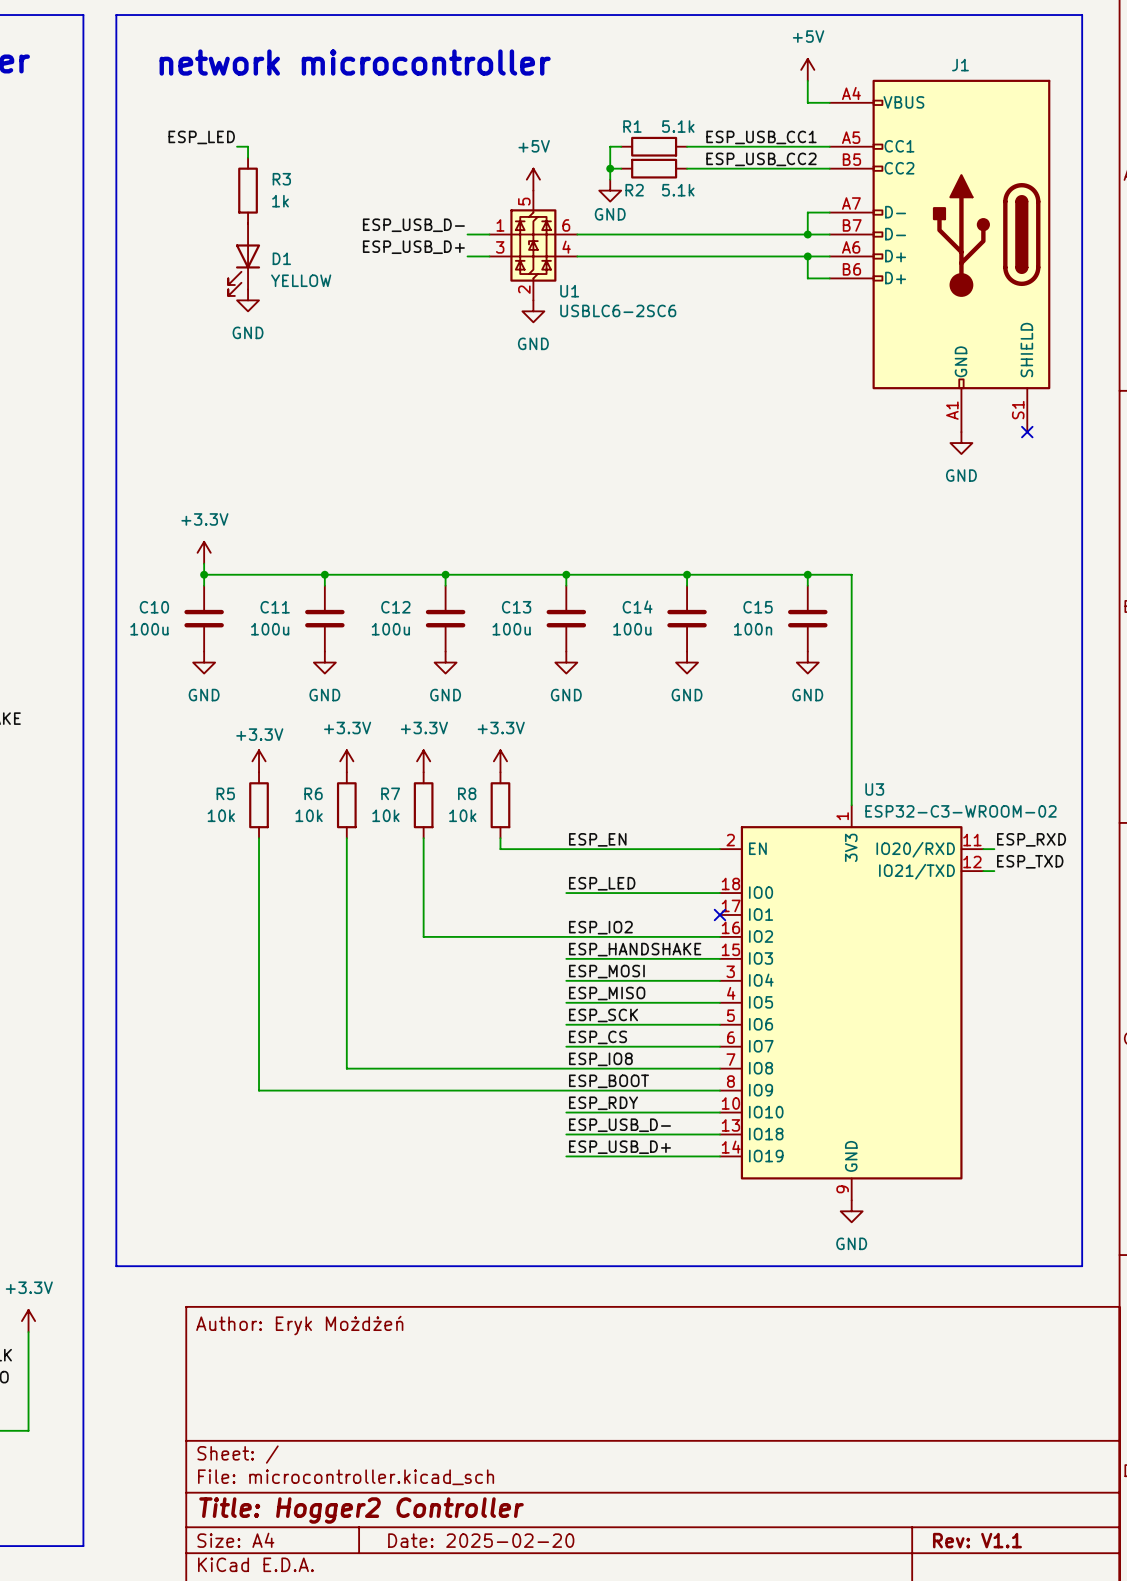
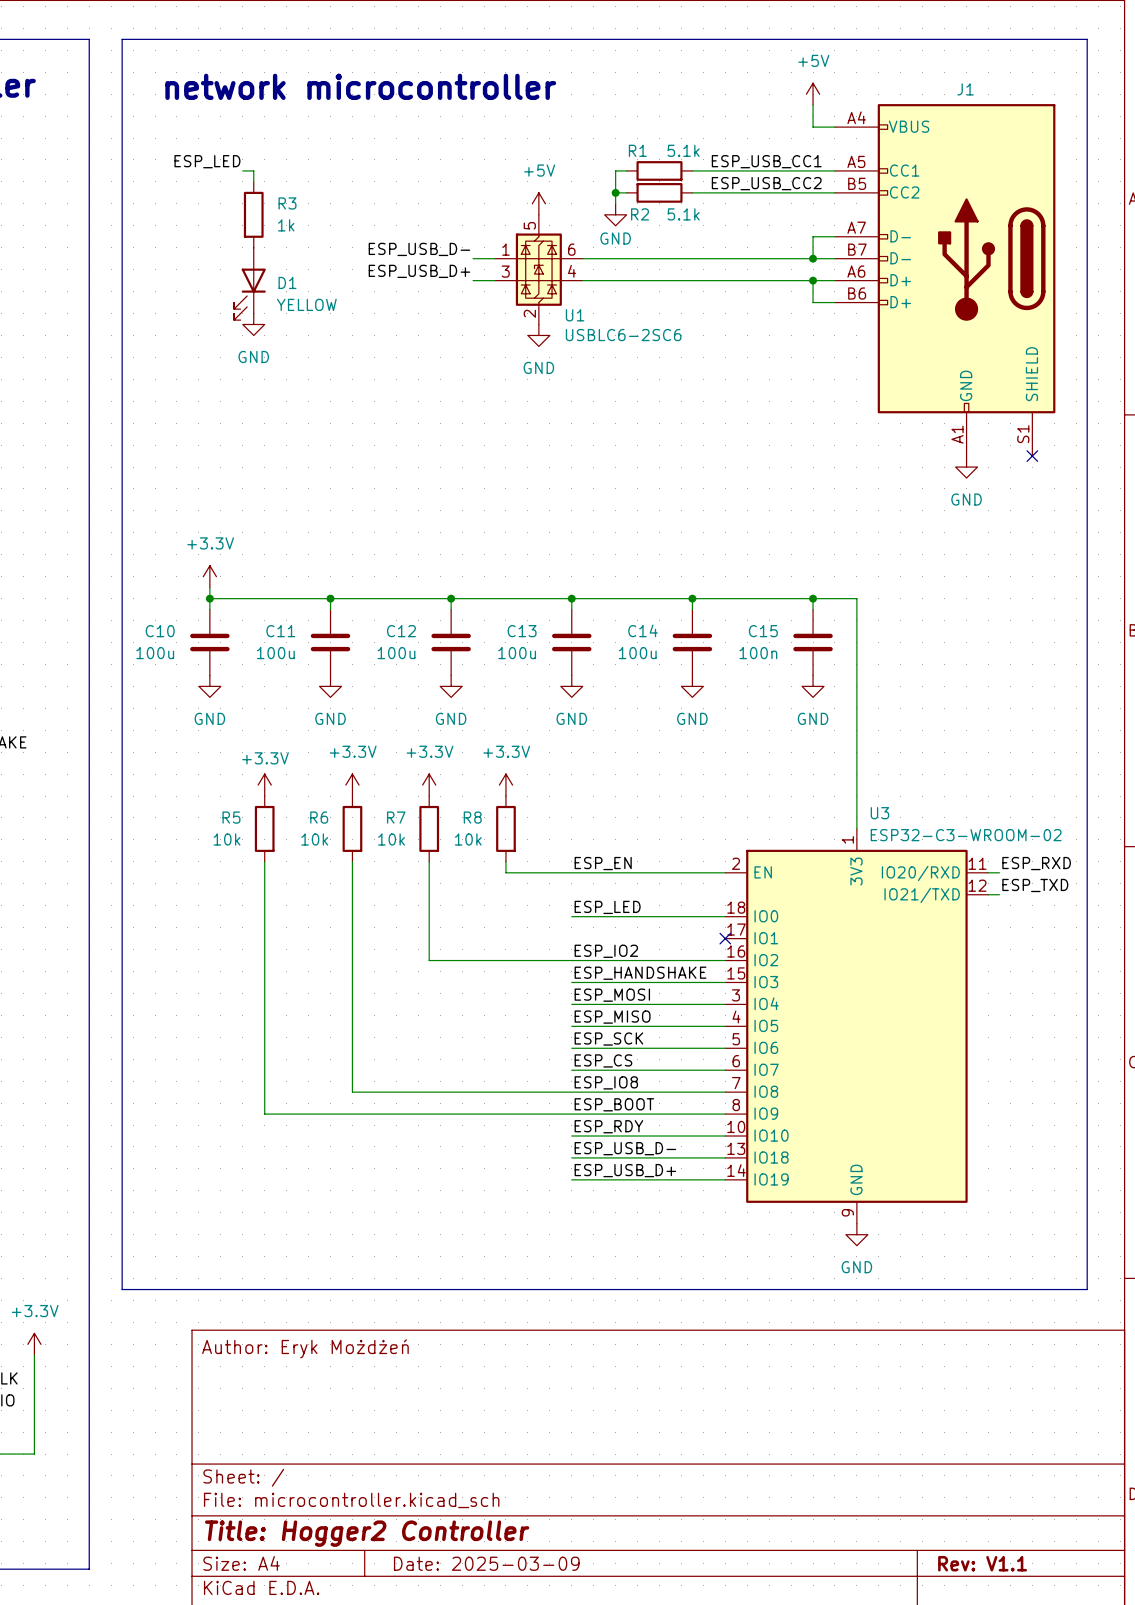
title block: Date: 2025-02-20 (481, 1540) -> Date: 2025-03-09 (486, 1563)

